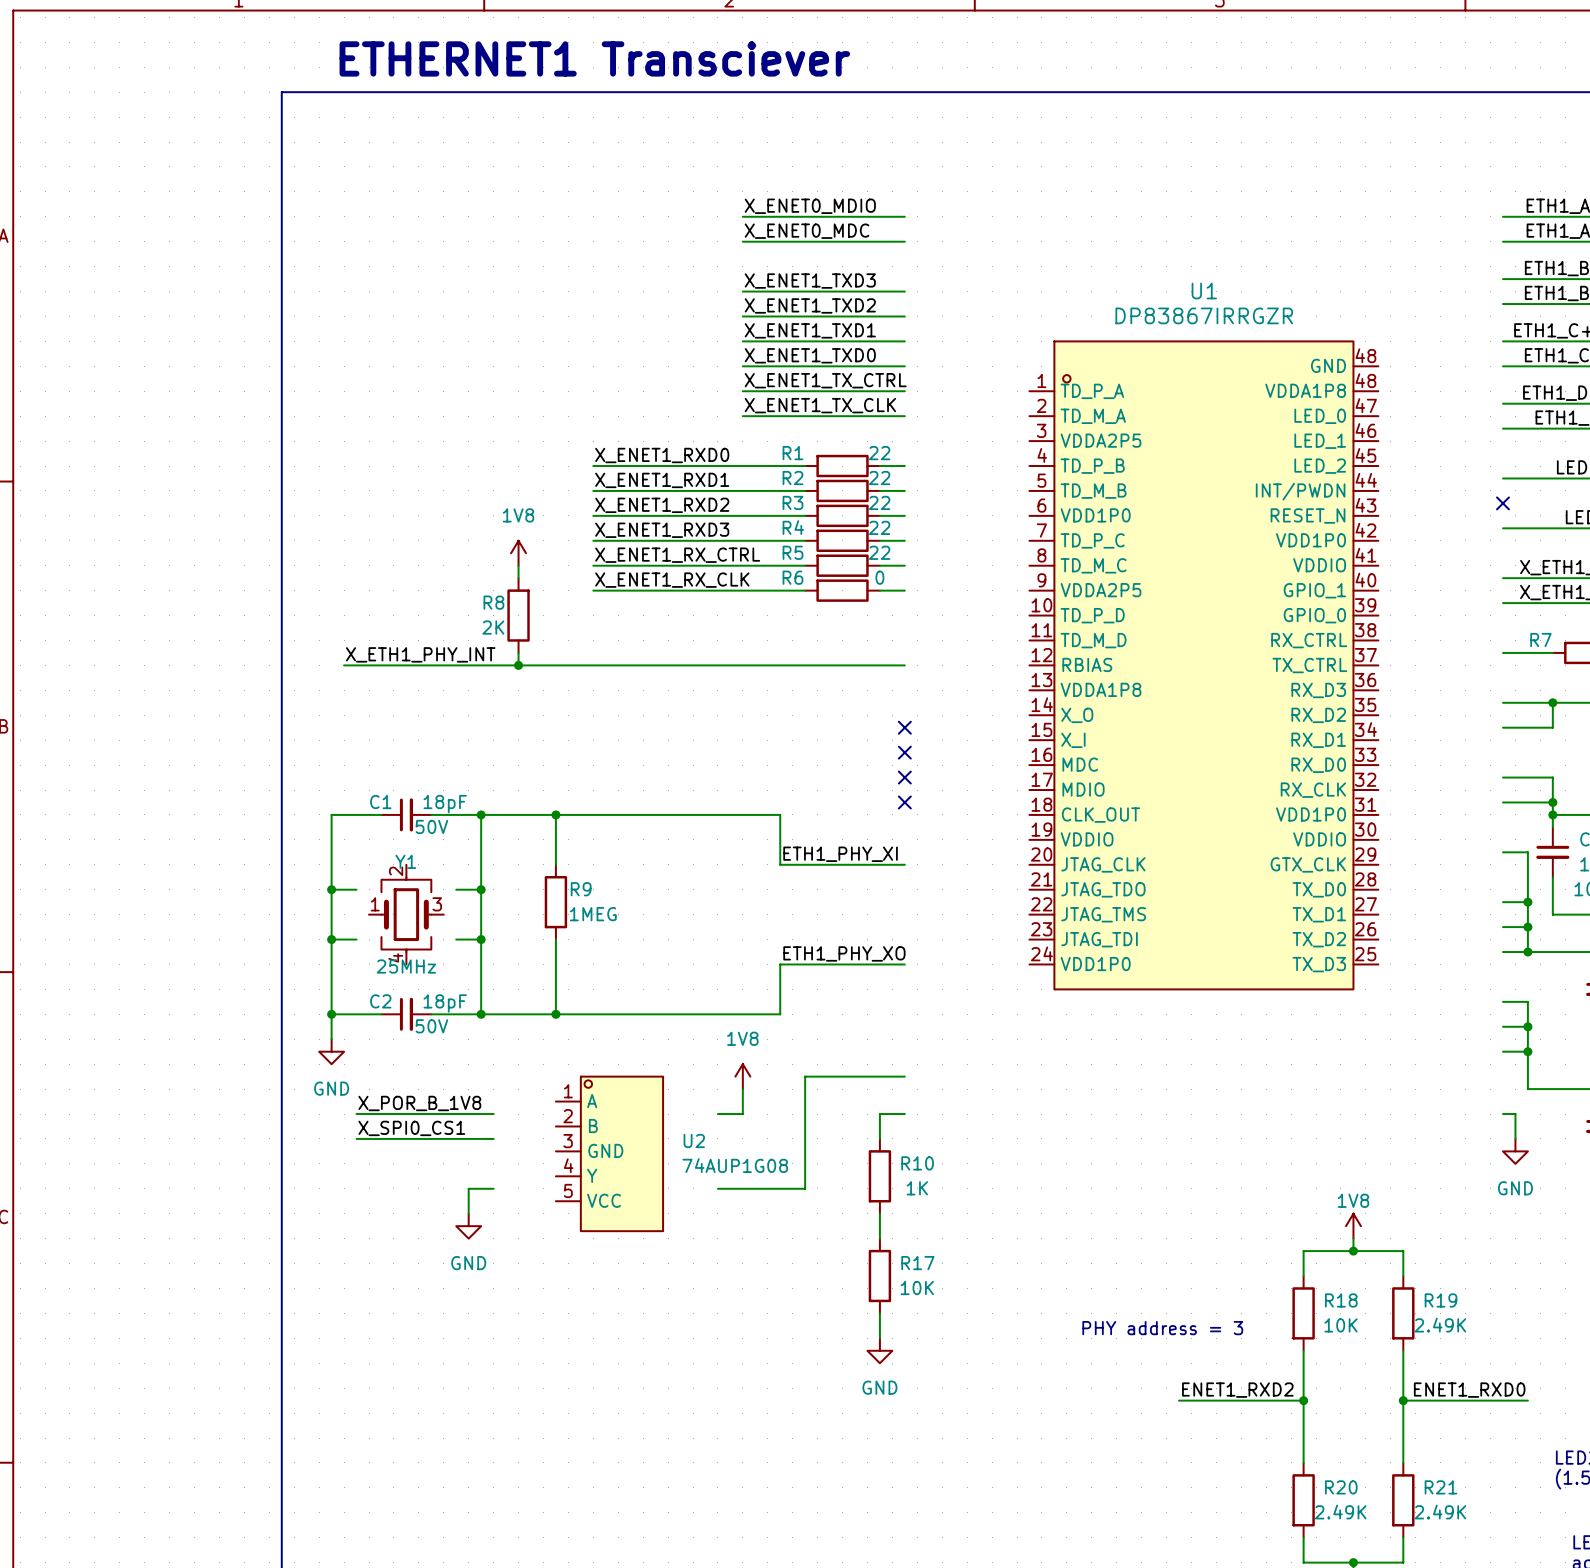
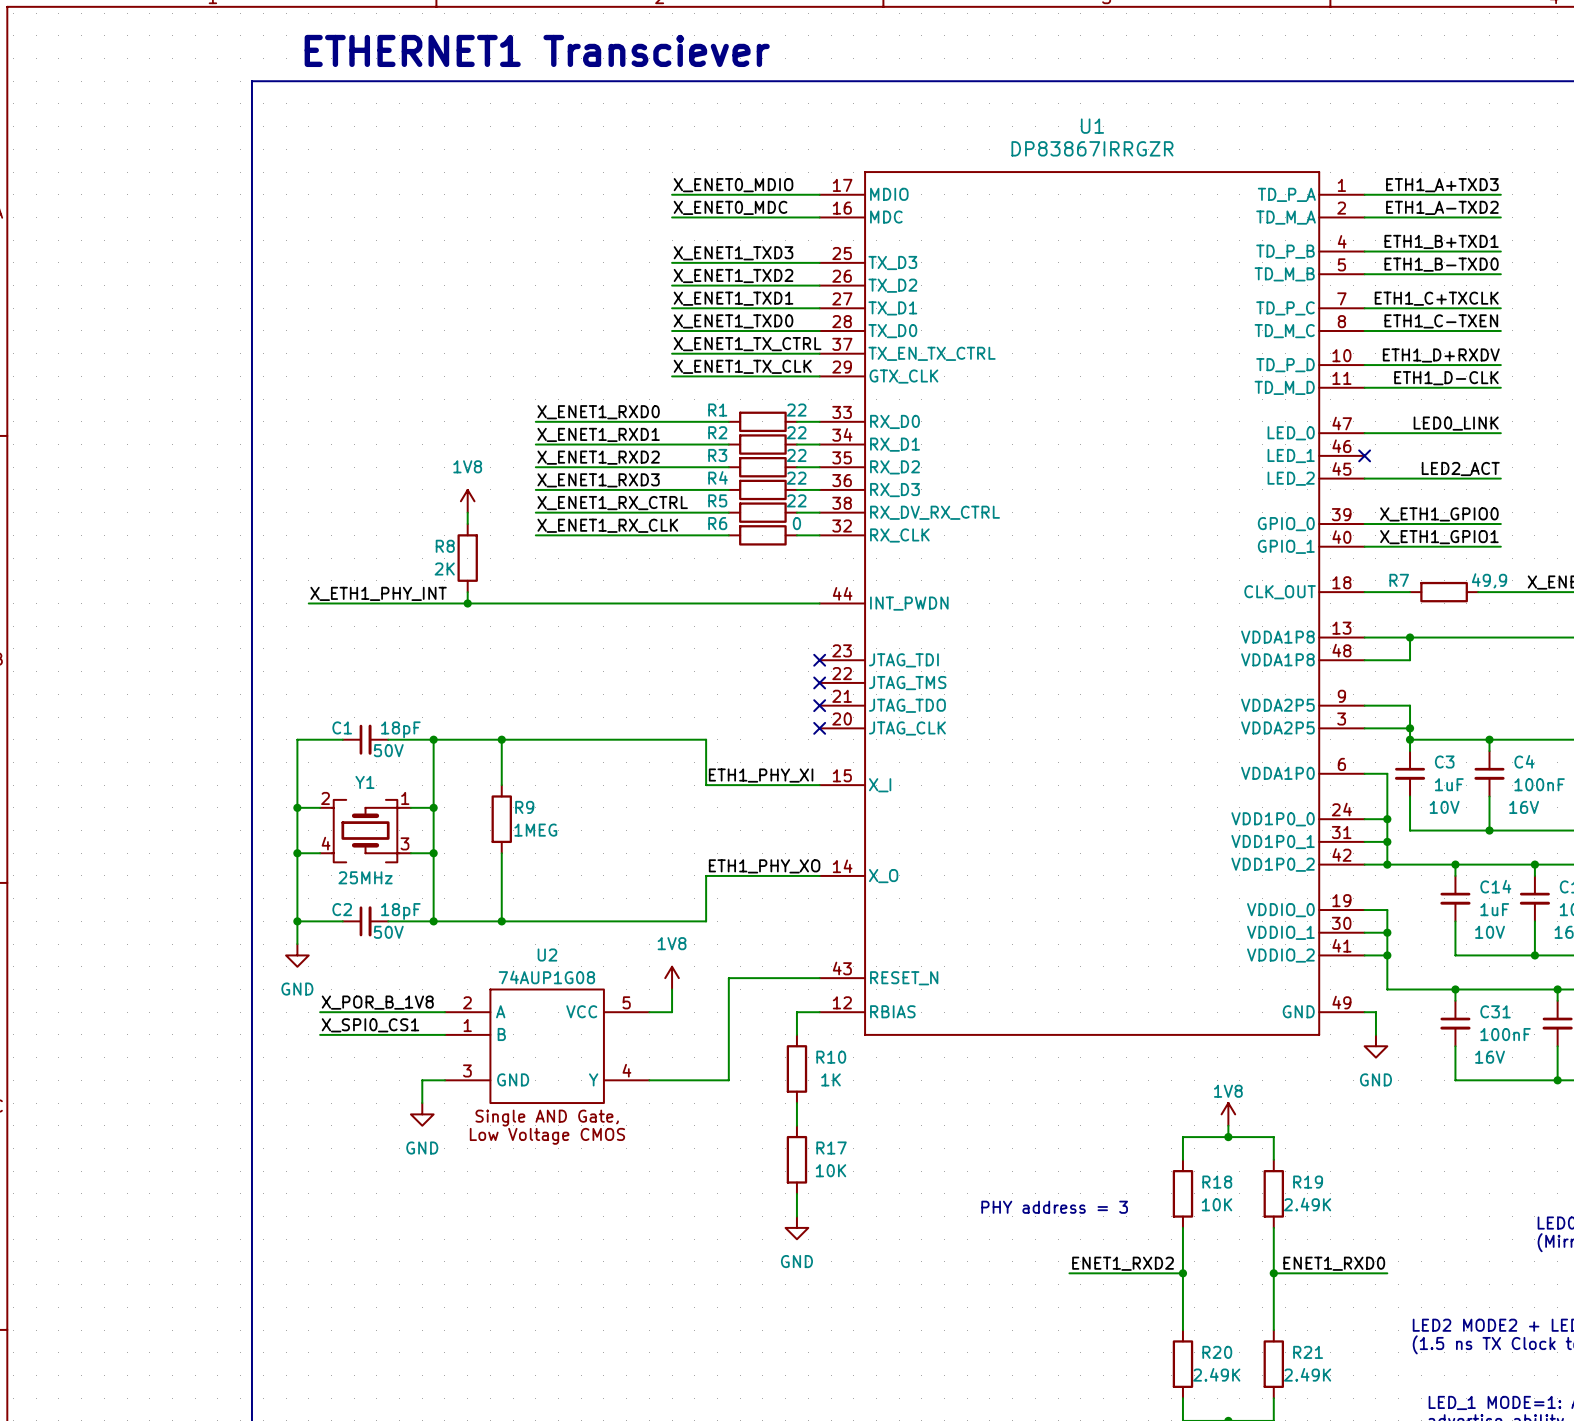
U1 name position: U1 (1204, 291) -> U1 (1092, 126)
U1 value position: DP83867IRRGZR (1204, 315) -> DP83867IRRGZR (1092, 148)
U1 symbol: [1029, 341, 1379, 990] -> [819, 171, 1365, 1036]
Y1 symbol: [369, 864, 444, 965] -> [320, 799, 411, 863]
U2 symbol: [555, 1076, 664, 1232] -> [444, 989, 650, 1104]
U2 name position: U2 (694, 1140) -> U2 (547, 955)
U2 value position: 74AUP1G08 (735, 1165) -> 74AUP1G08 (546, 977)

